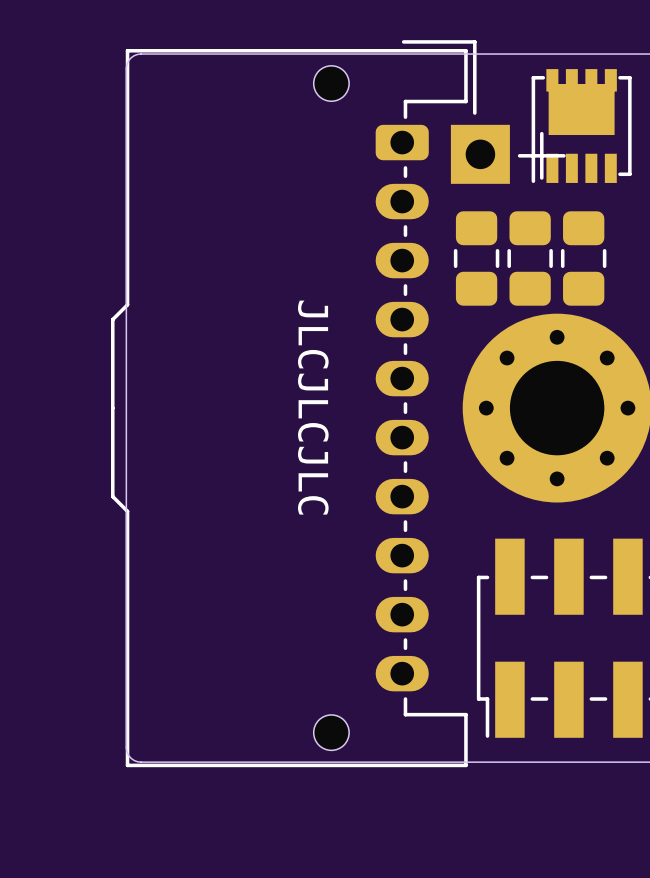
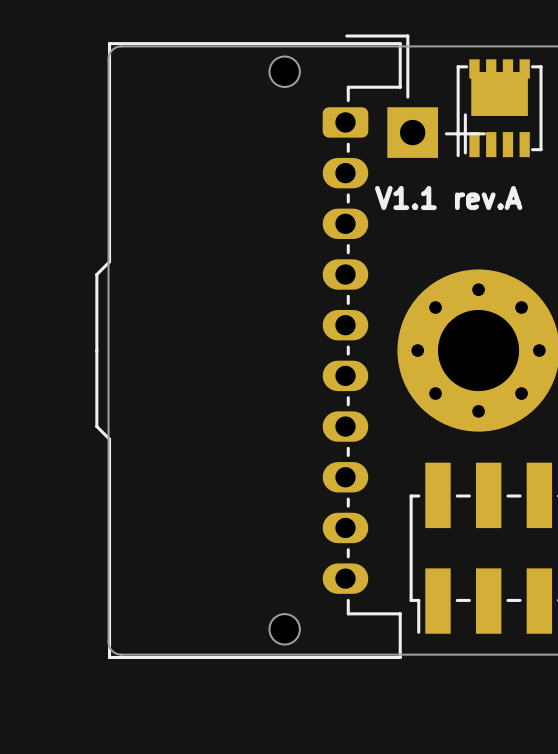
text: none -> V1.1 rev.A (448, 198)
part: (476, 258) -> none
part: (530, 258) -> none
part: (583, 258) -> none
text: JLCJLCJLC (313, 407) -> none

